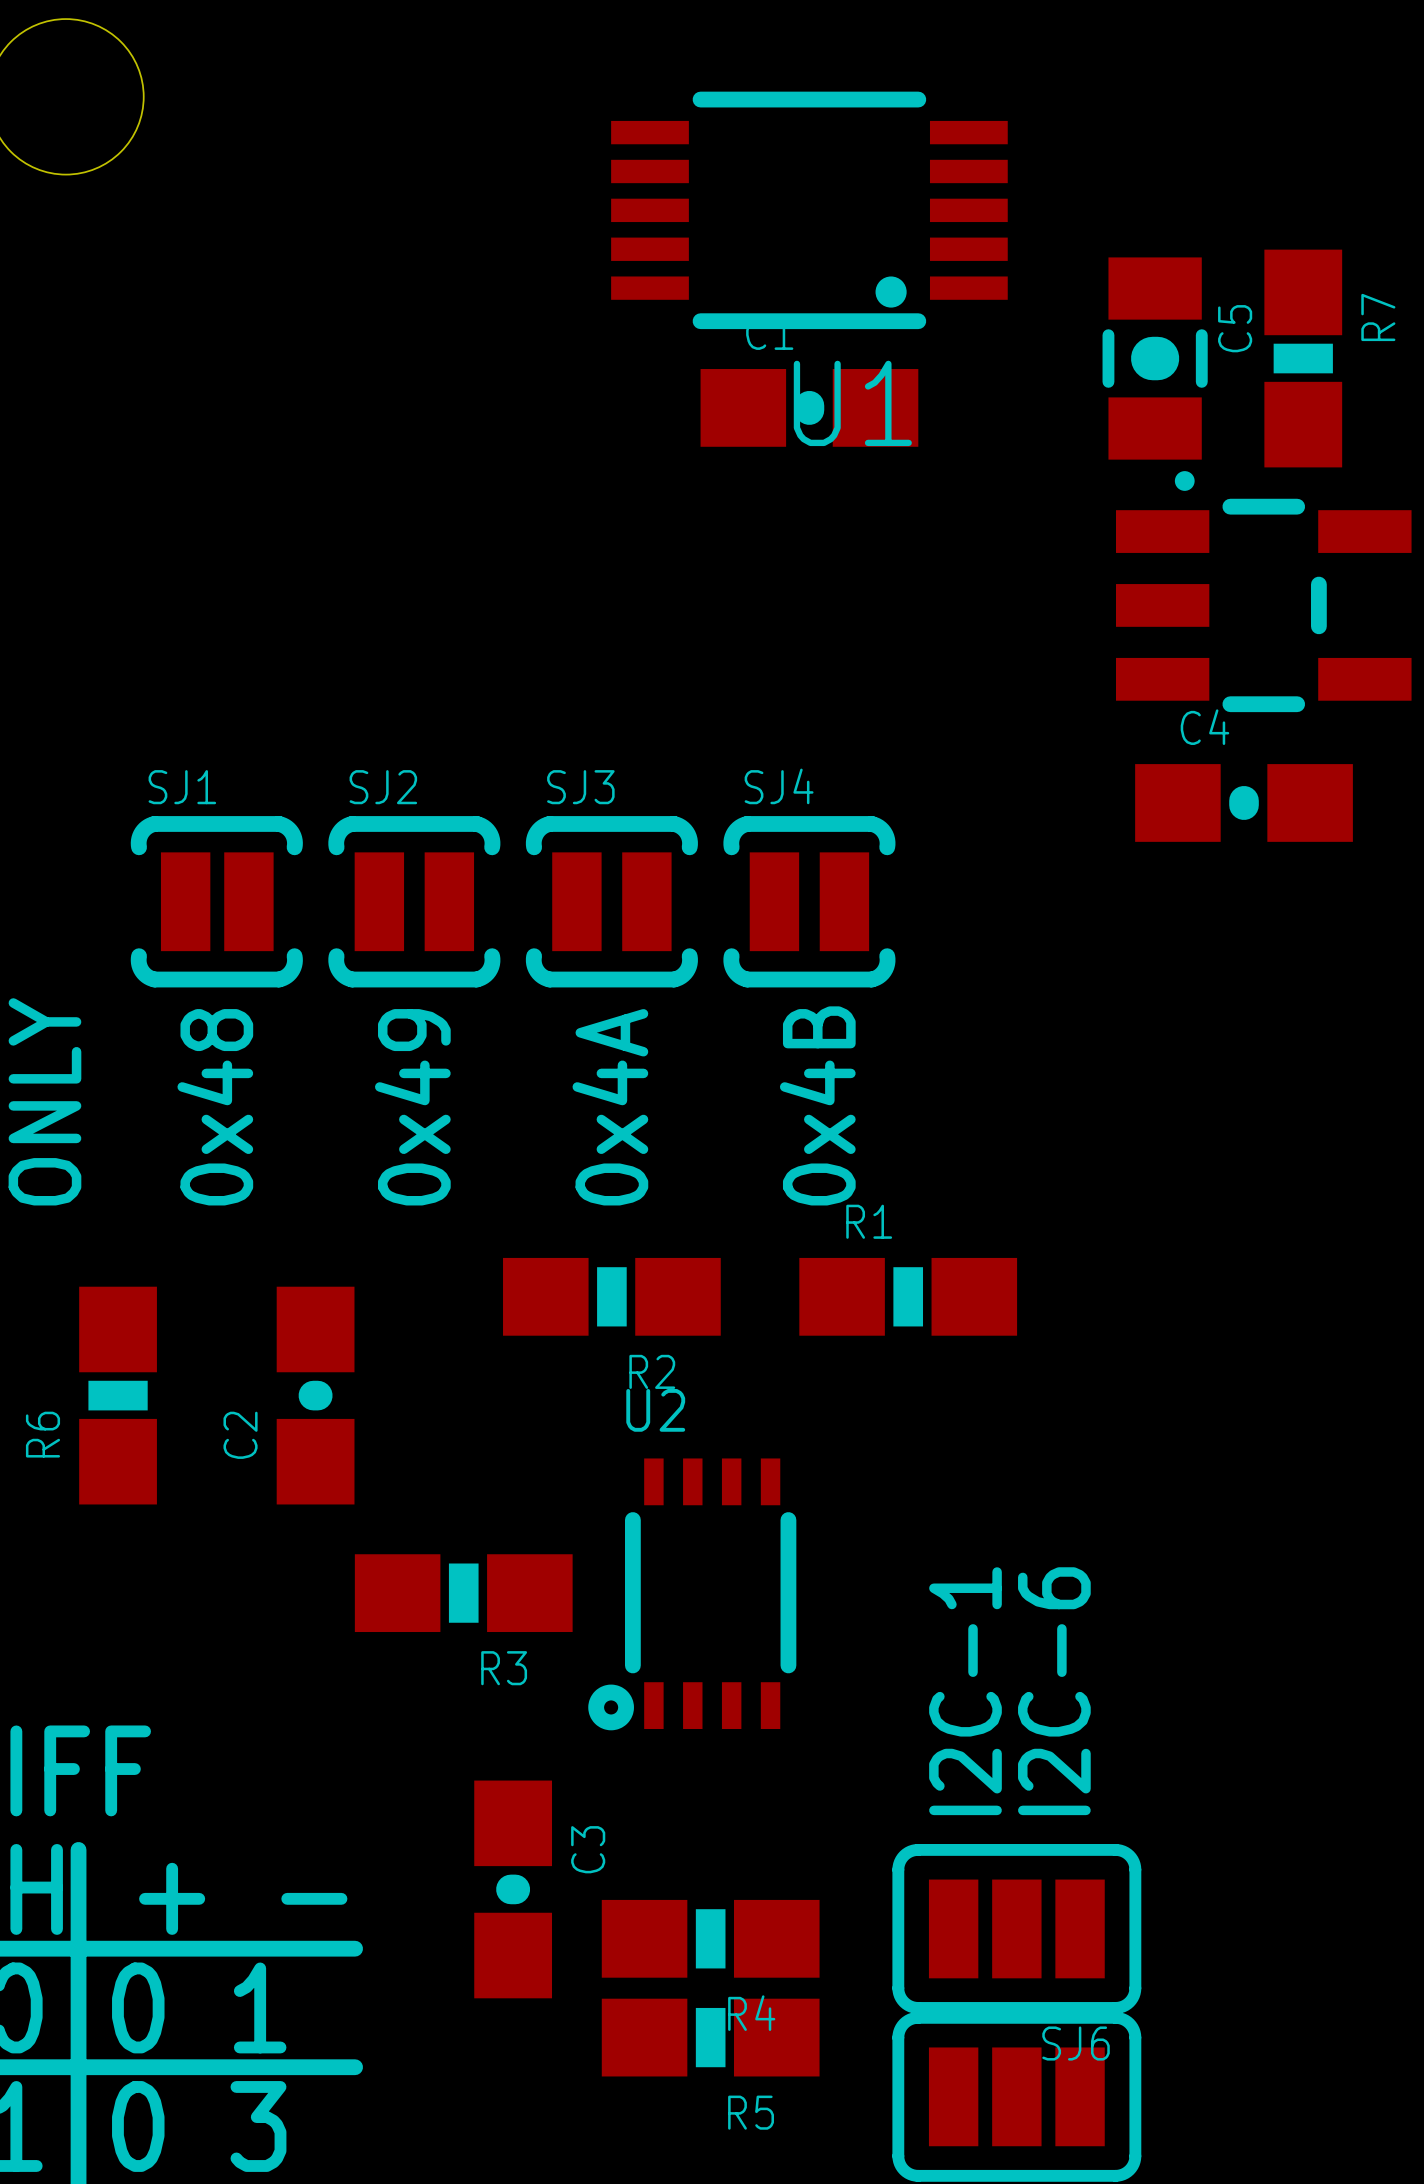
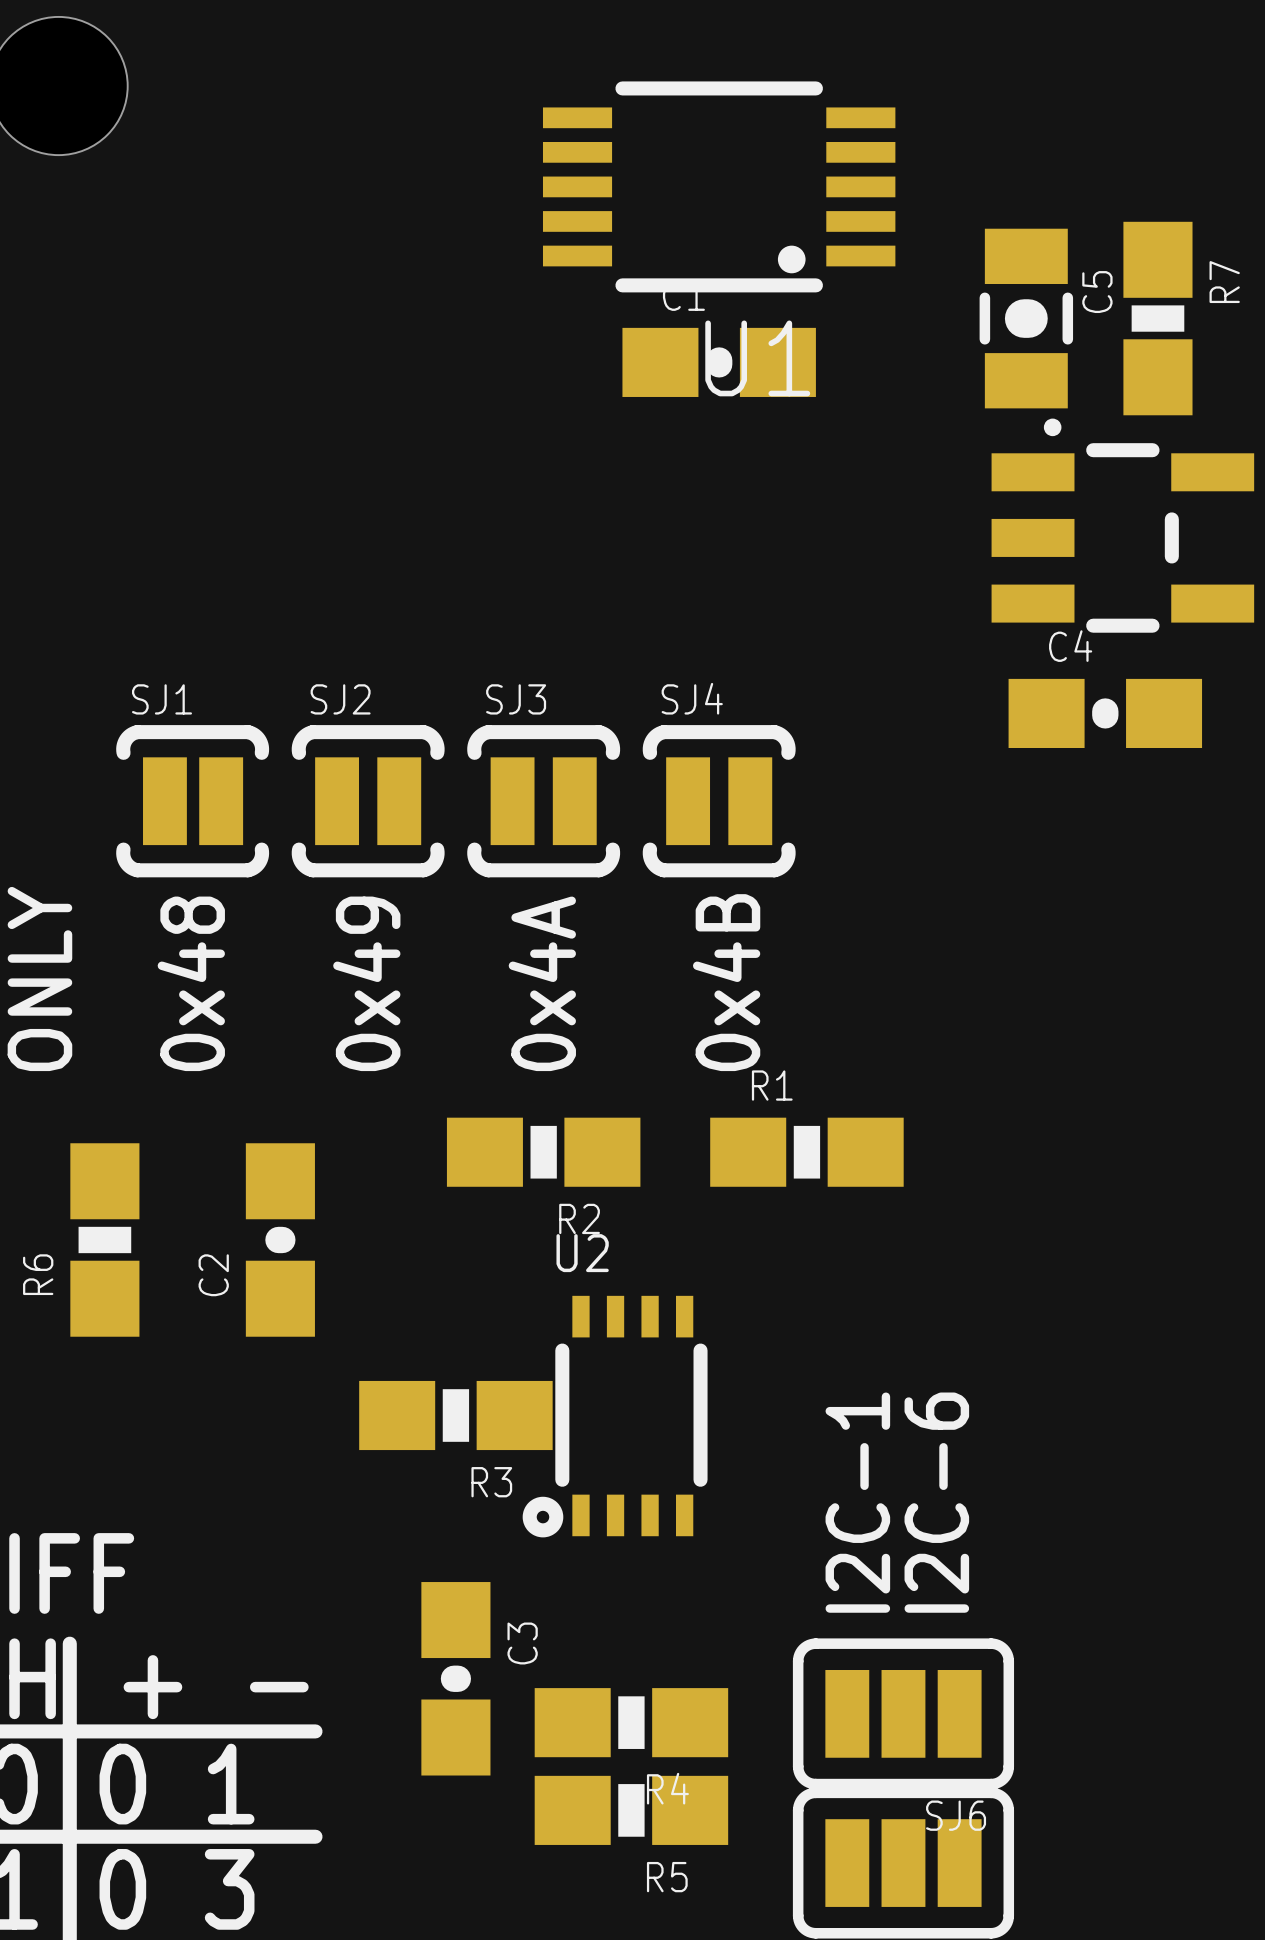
R3 position: (463, 1593) -> (455, 1415)

